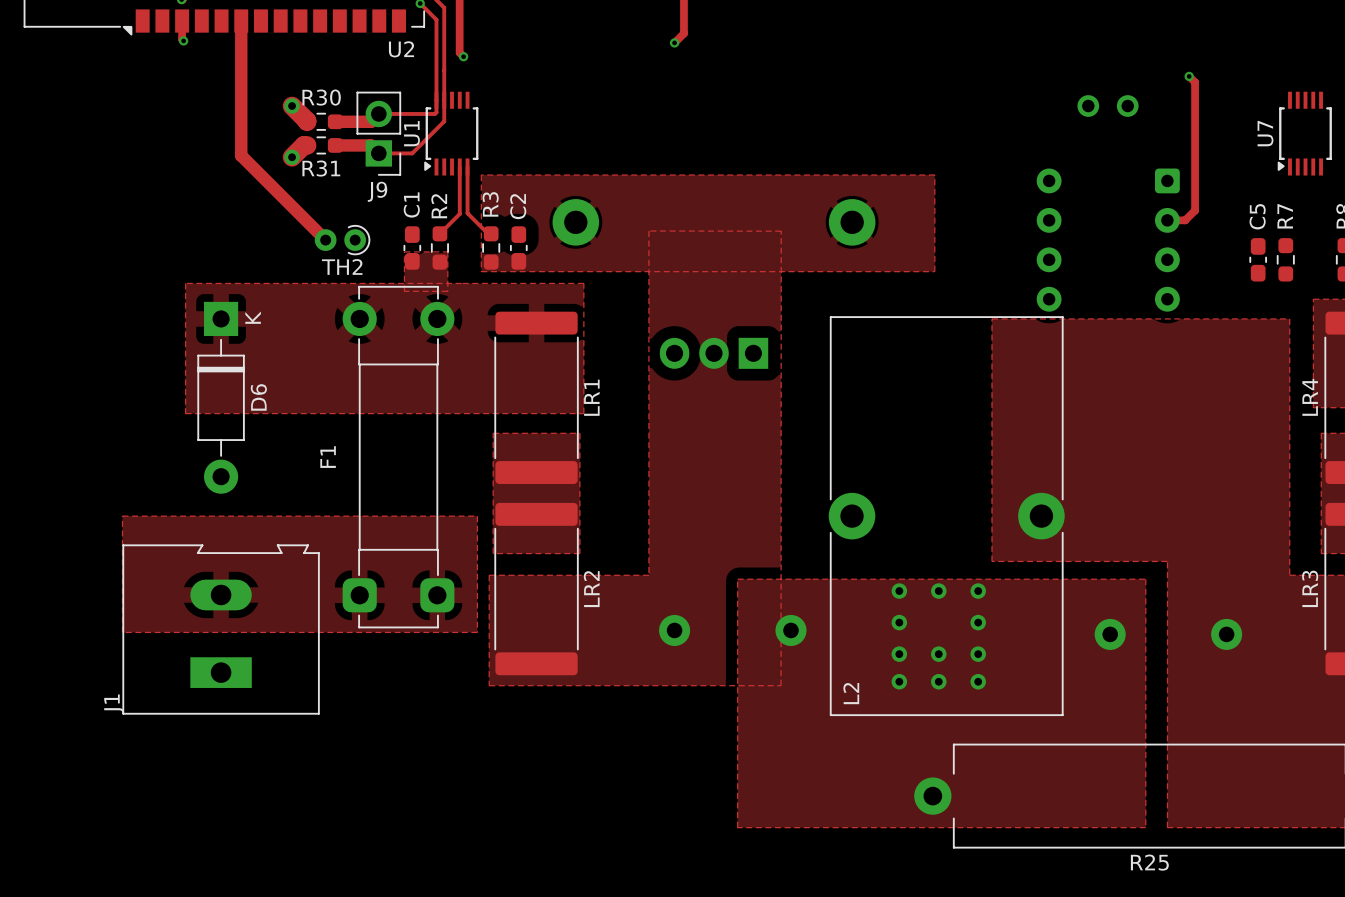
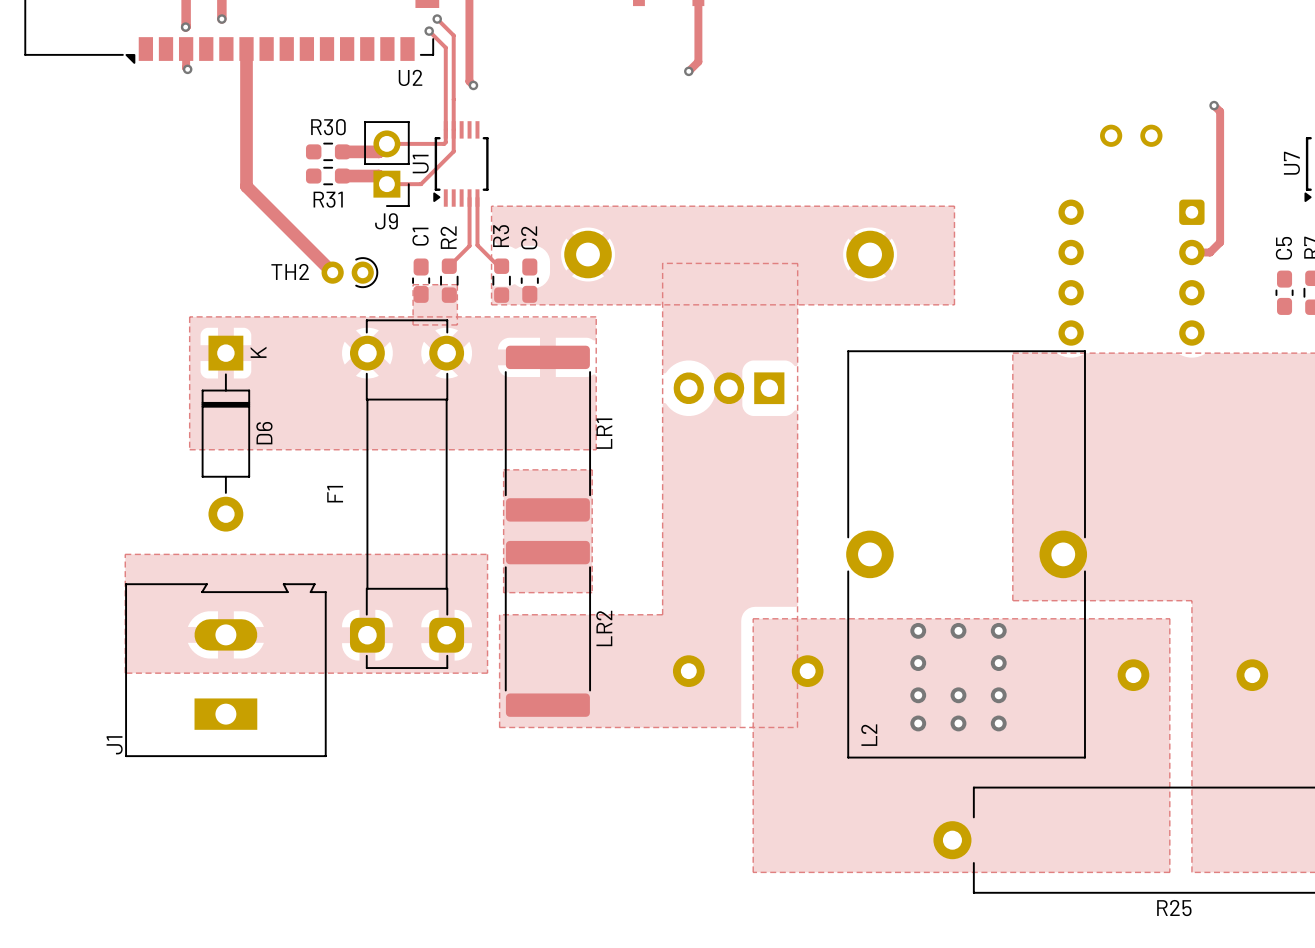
track: (292, 106) (307, 121) -> none
via: (292, 106) -> none
track: (307, 145) (303, 145) (292, 157) -> none
via: (292, 157) -> none
TH2 name position: TH2 (342, 266) -> TH2 (290, 271)

